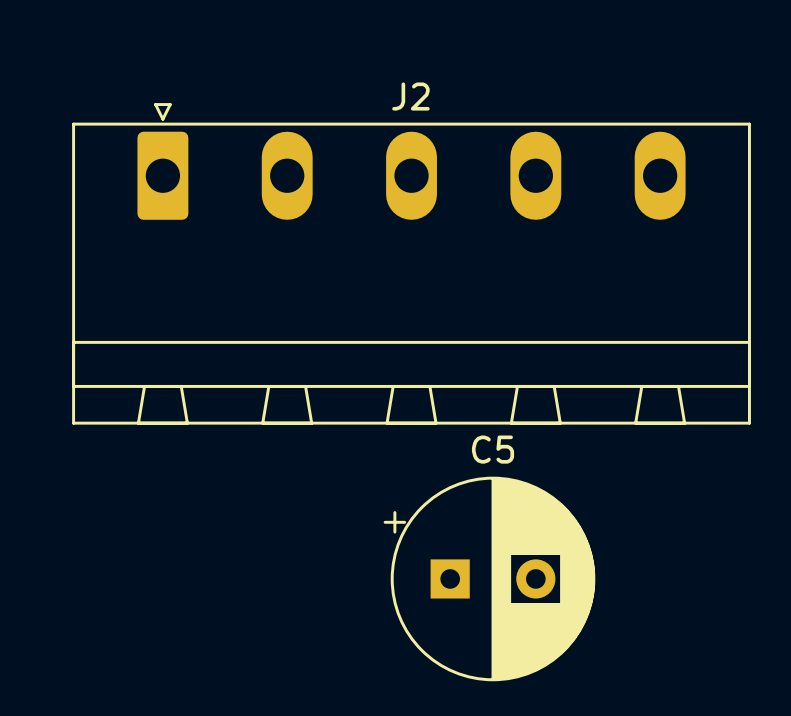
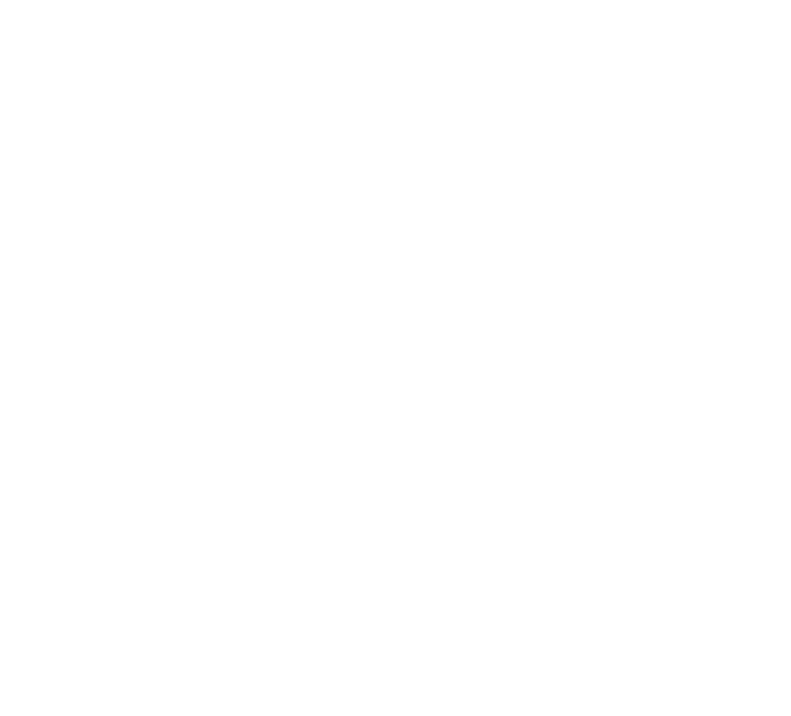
J2: (411, 263) -> none
C5: (489, 578) -> none

